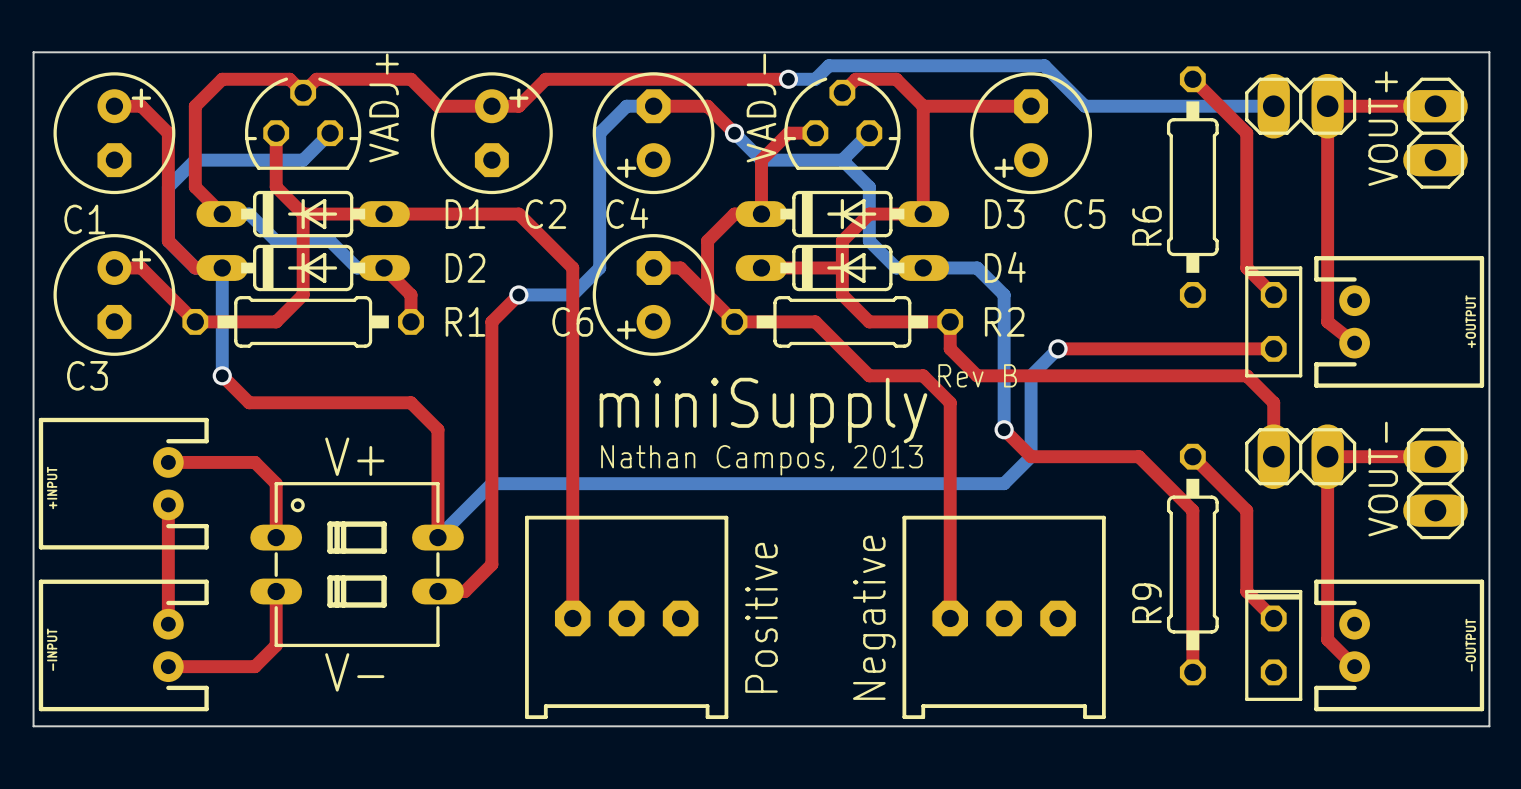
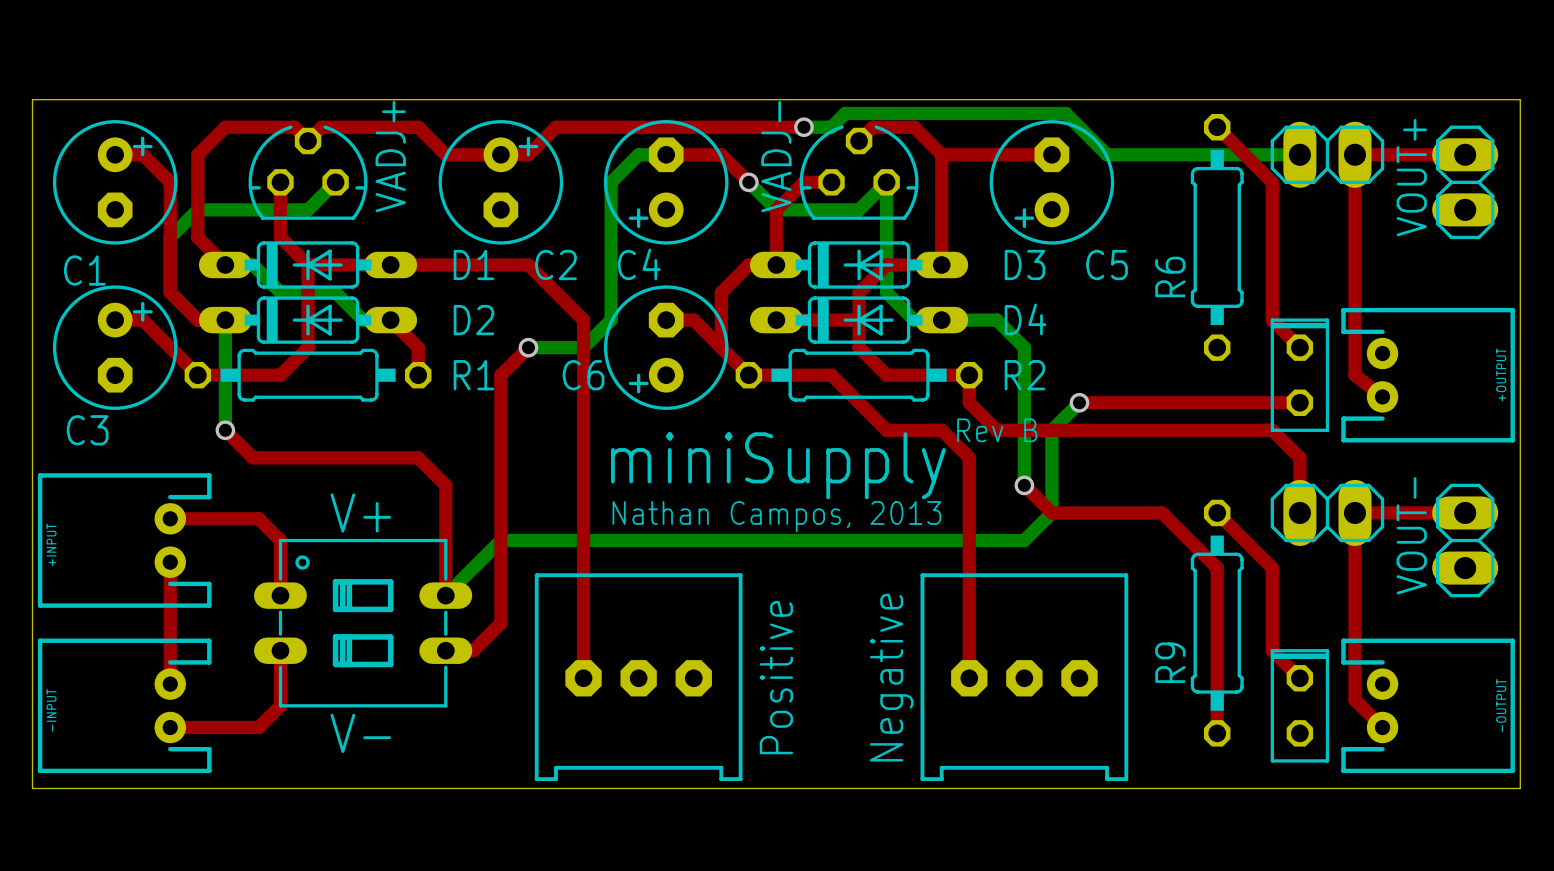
bottom track: (842, 160) (869, 187) -> (886, 182) (886, 237)

